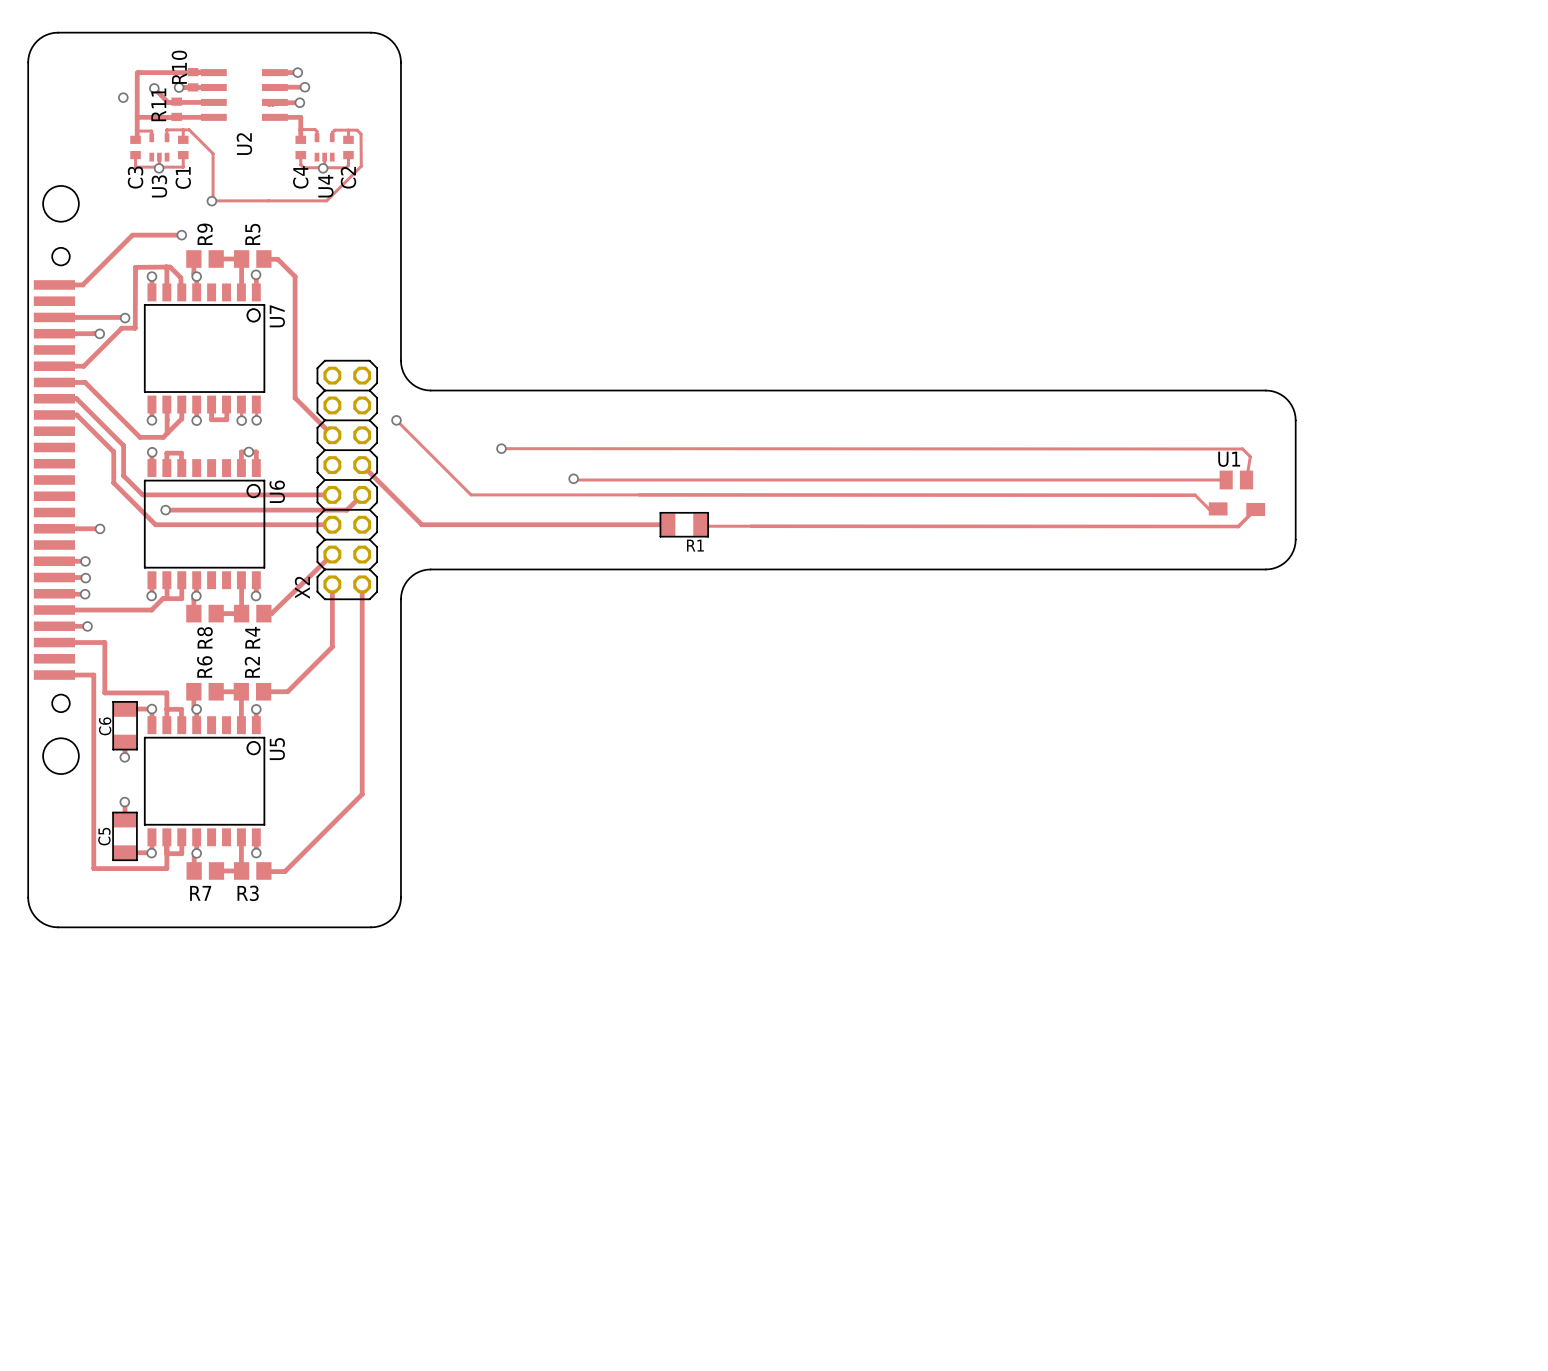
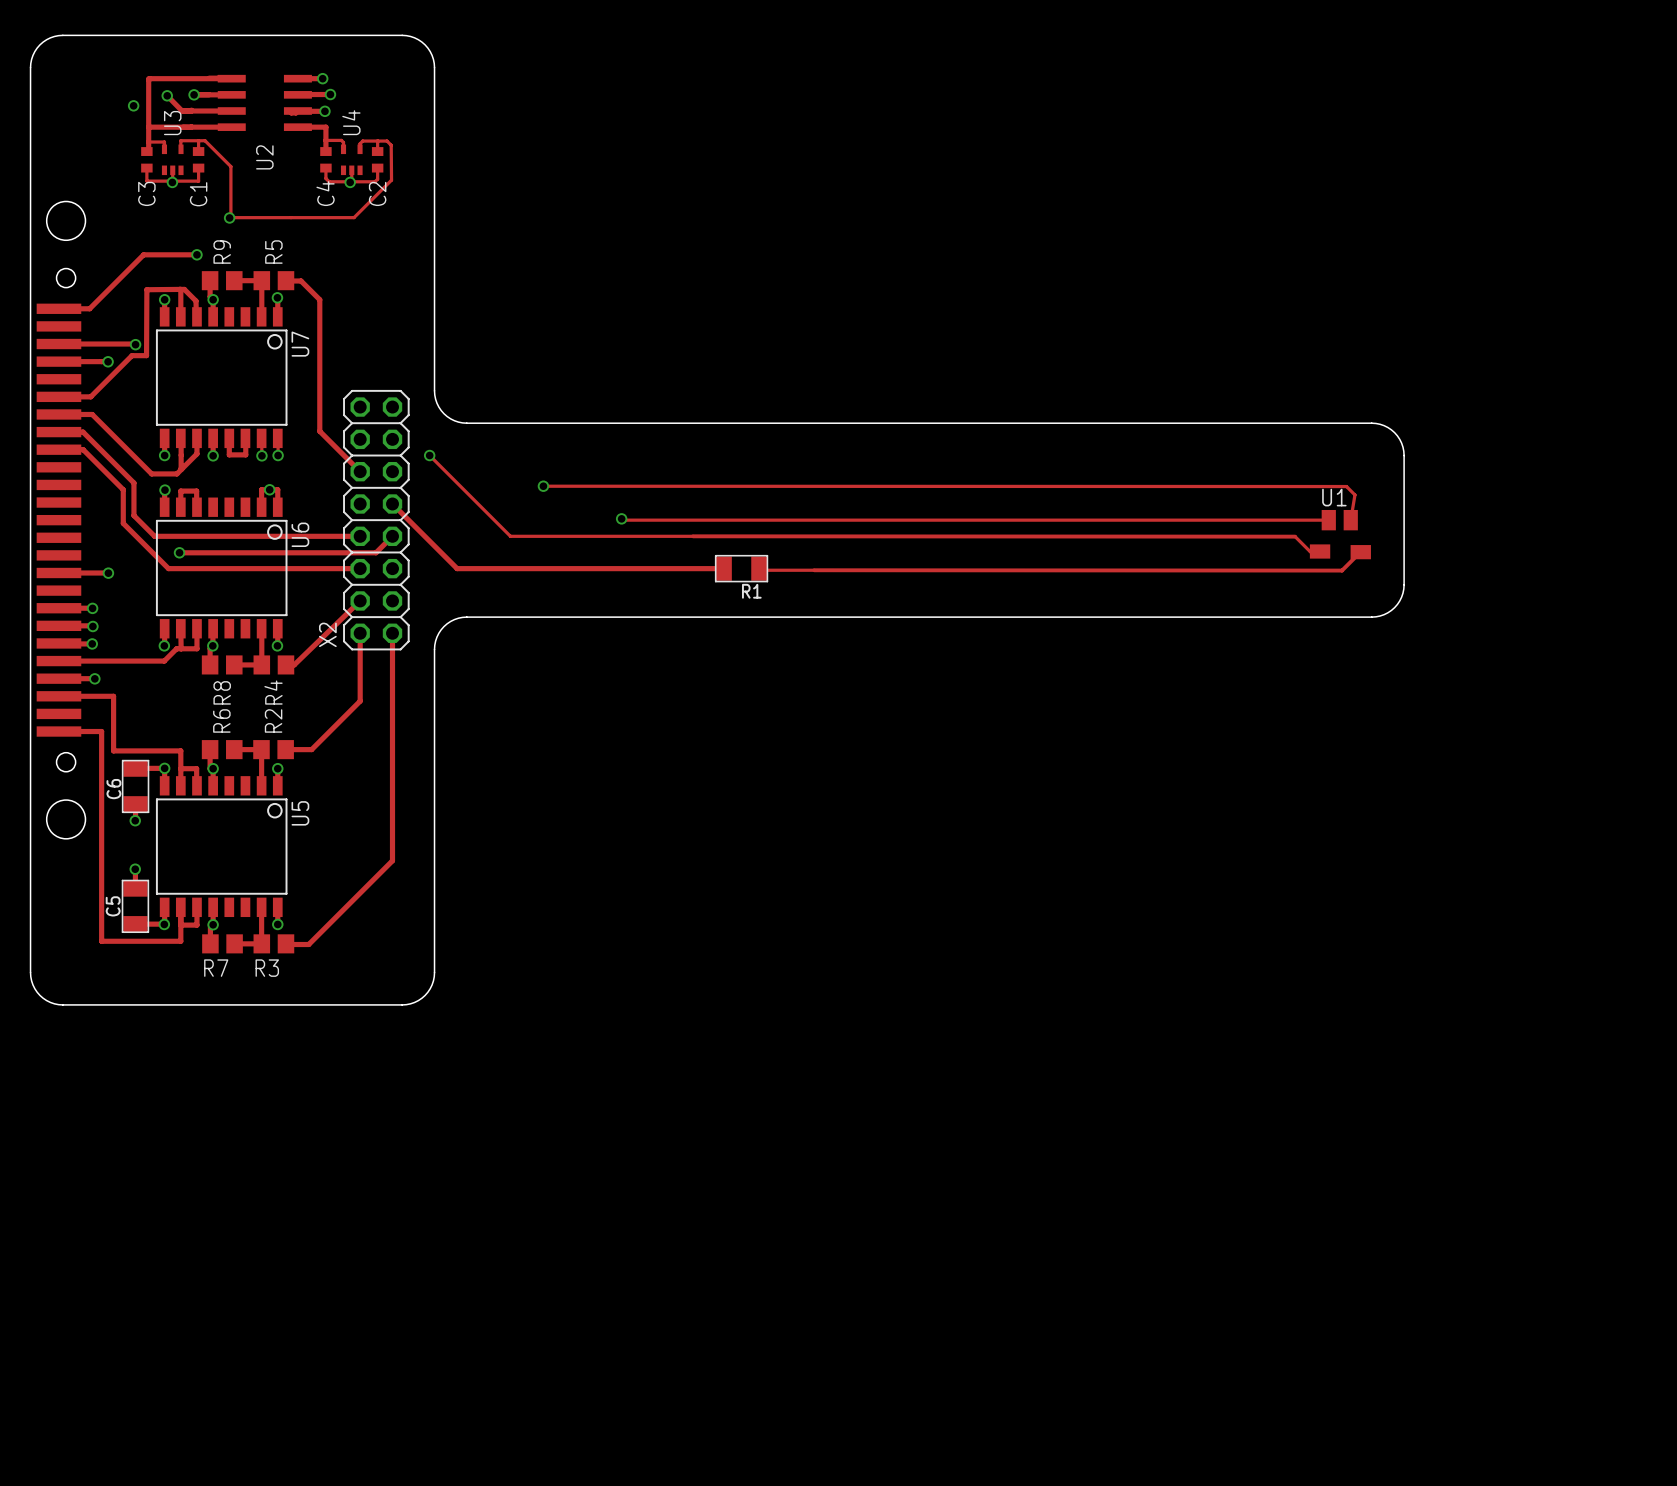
R10: (193, 79) -> none
R11: (176, 109) -> none
U3 name position: U3 (159, 186) -> U3 (172, 123)
U4 name position: U4 (325, 186) -> U4 (351, 122)

